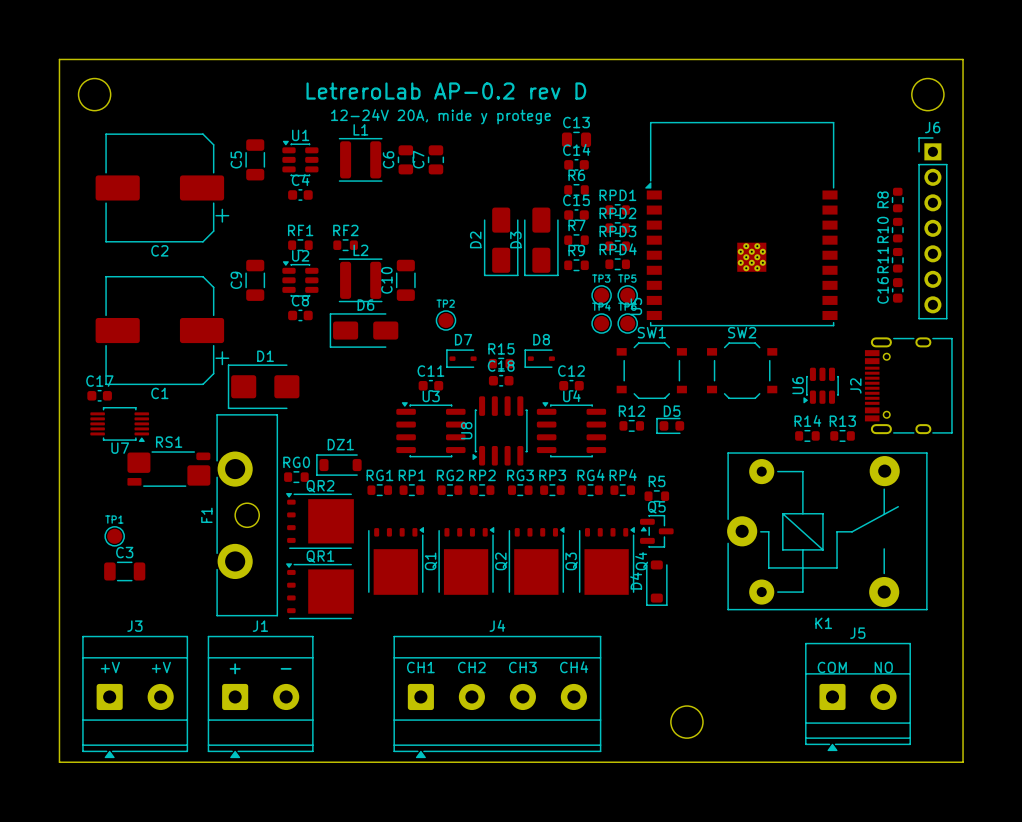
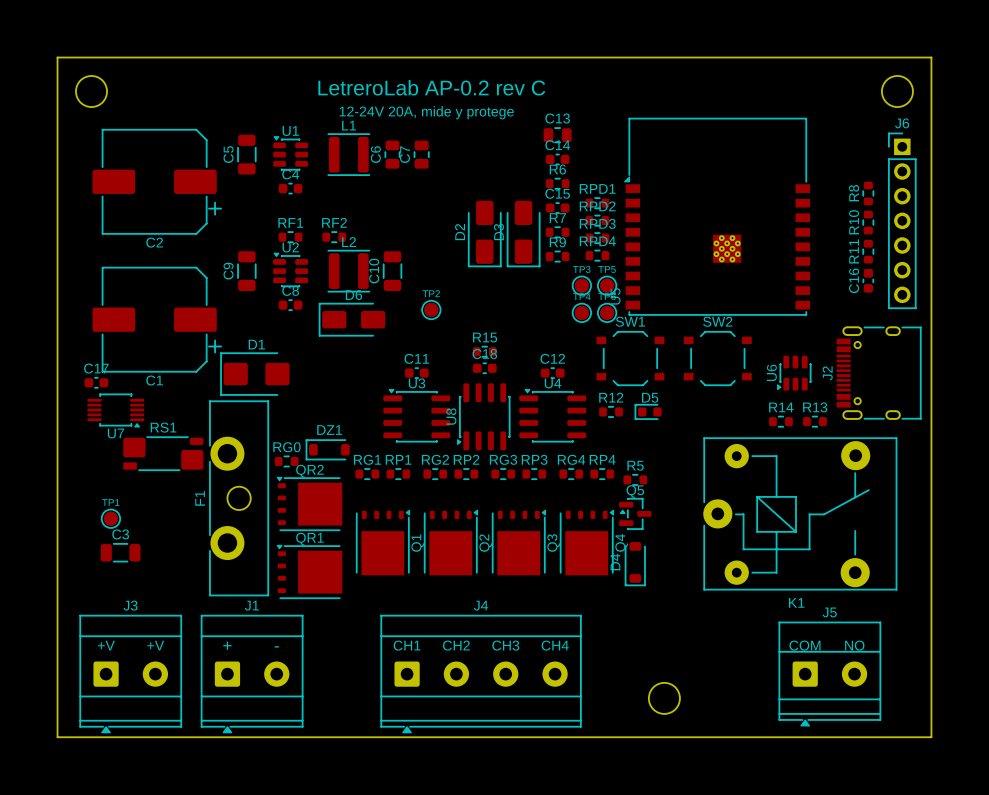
text: LetreroLab AP-0.2 rev D (446, 91) -> LetreroLab AP-0.2 rev C (431, 87)
D7: (461, 358) -> none
D8: (539, 358) -> none

